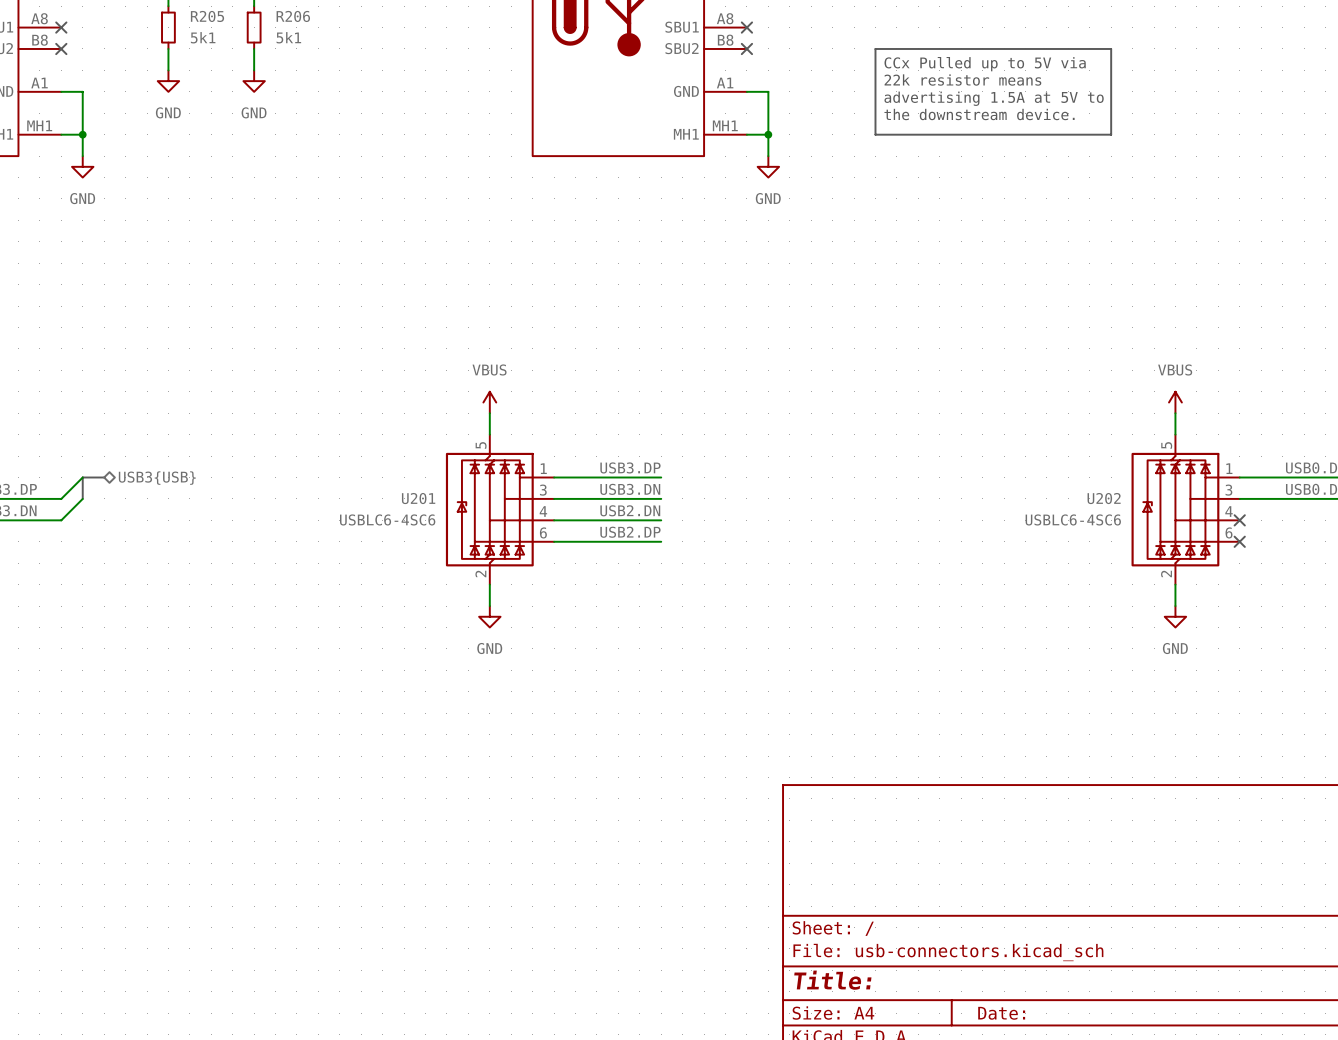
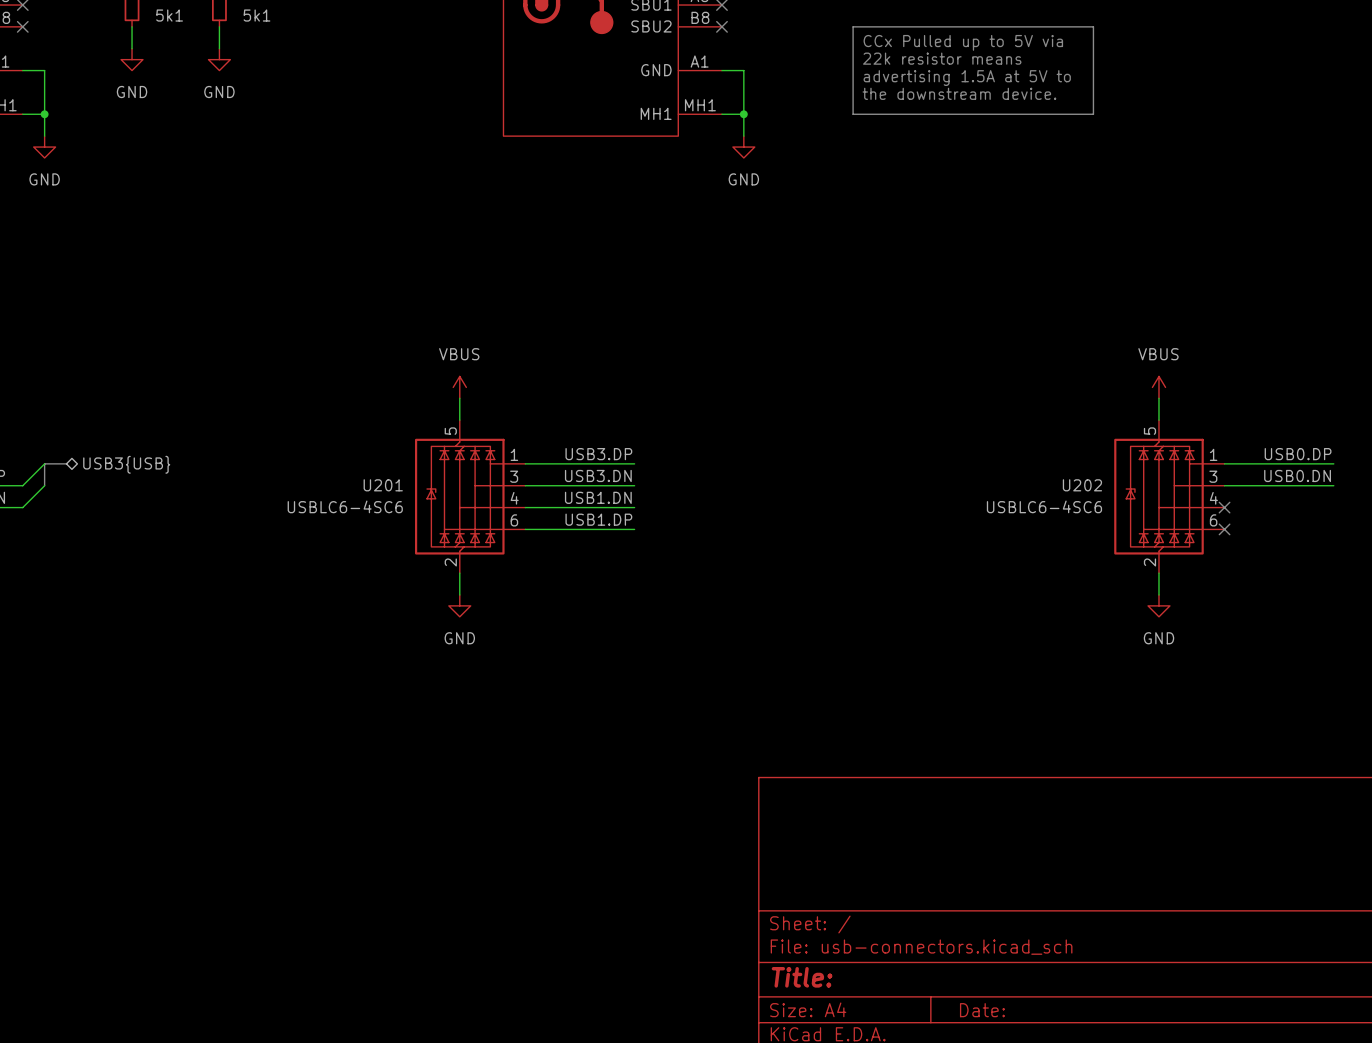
label: USB2.DN (630, 510) -> USB1.DN (598, 497)
label: USB2.DP (630, 532) -> USB1.DP (598, 519)

